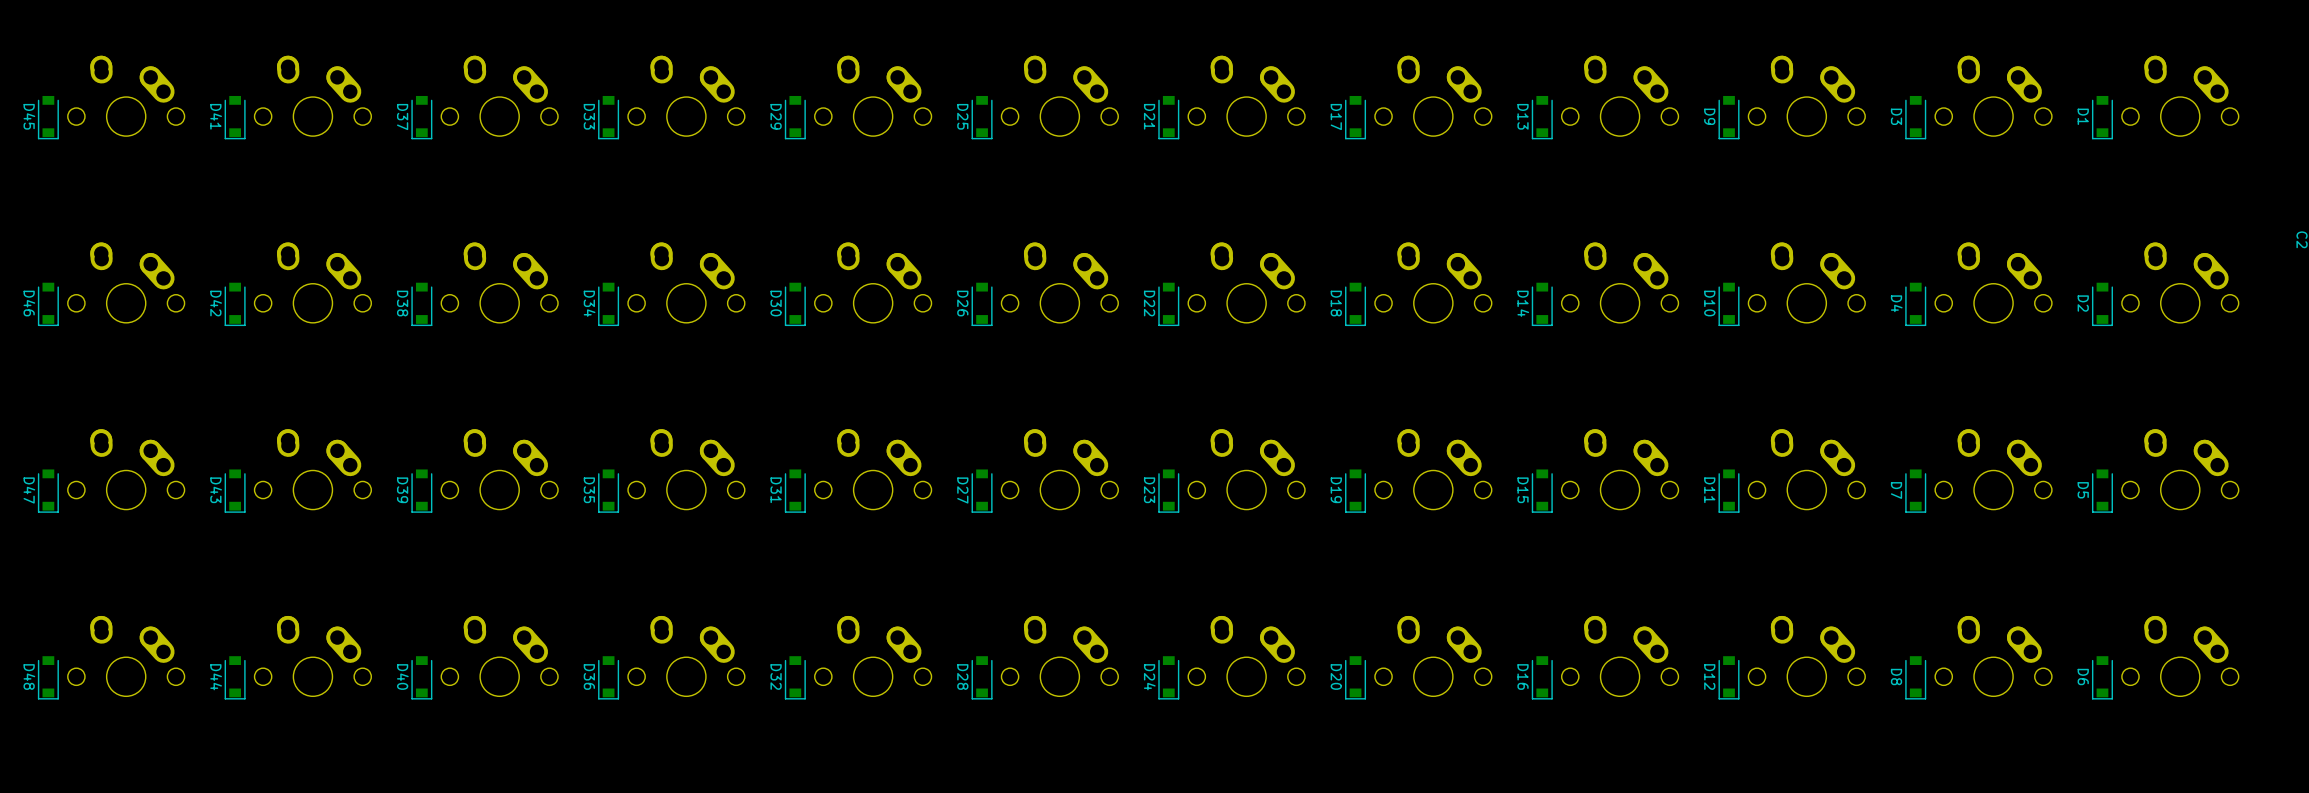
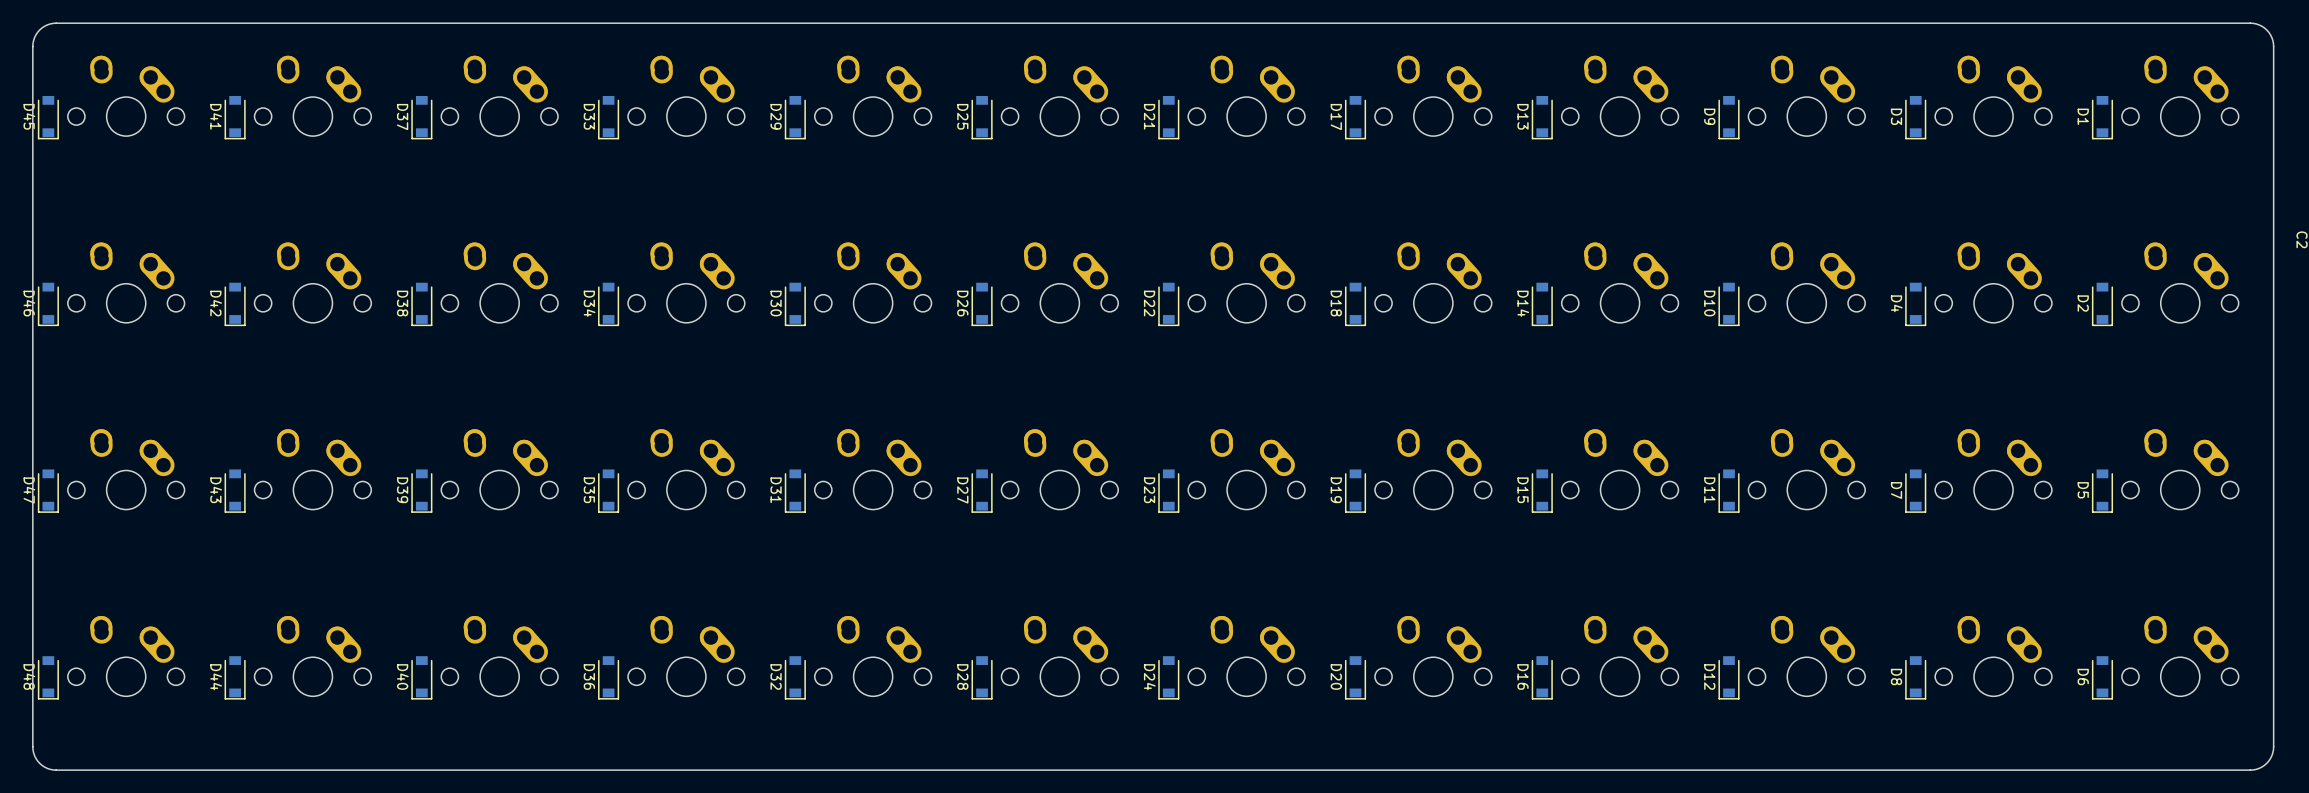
board edge: none -> (2250, 23) (50, 23) (37, 32) (32, 46) (33, 752) (41, 765) (56, 770) (2256, 769) (2268, 761) (2273, 746) (2273, 46) (2271, 37) (2266, 30) (2259, 24) (2250, 23)

